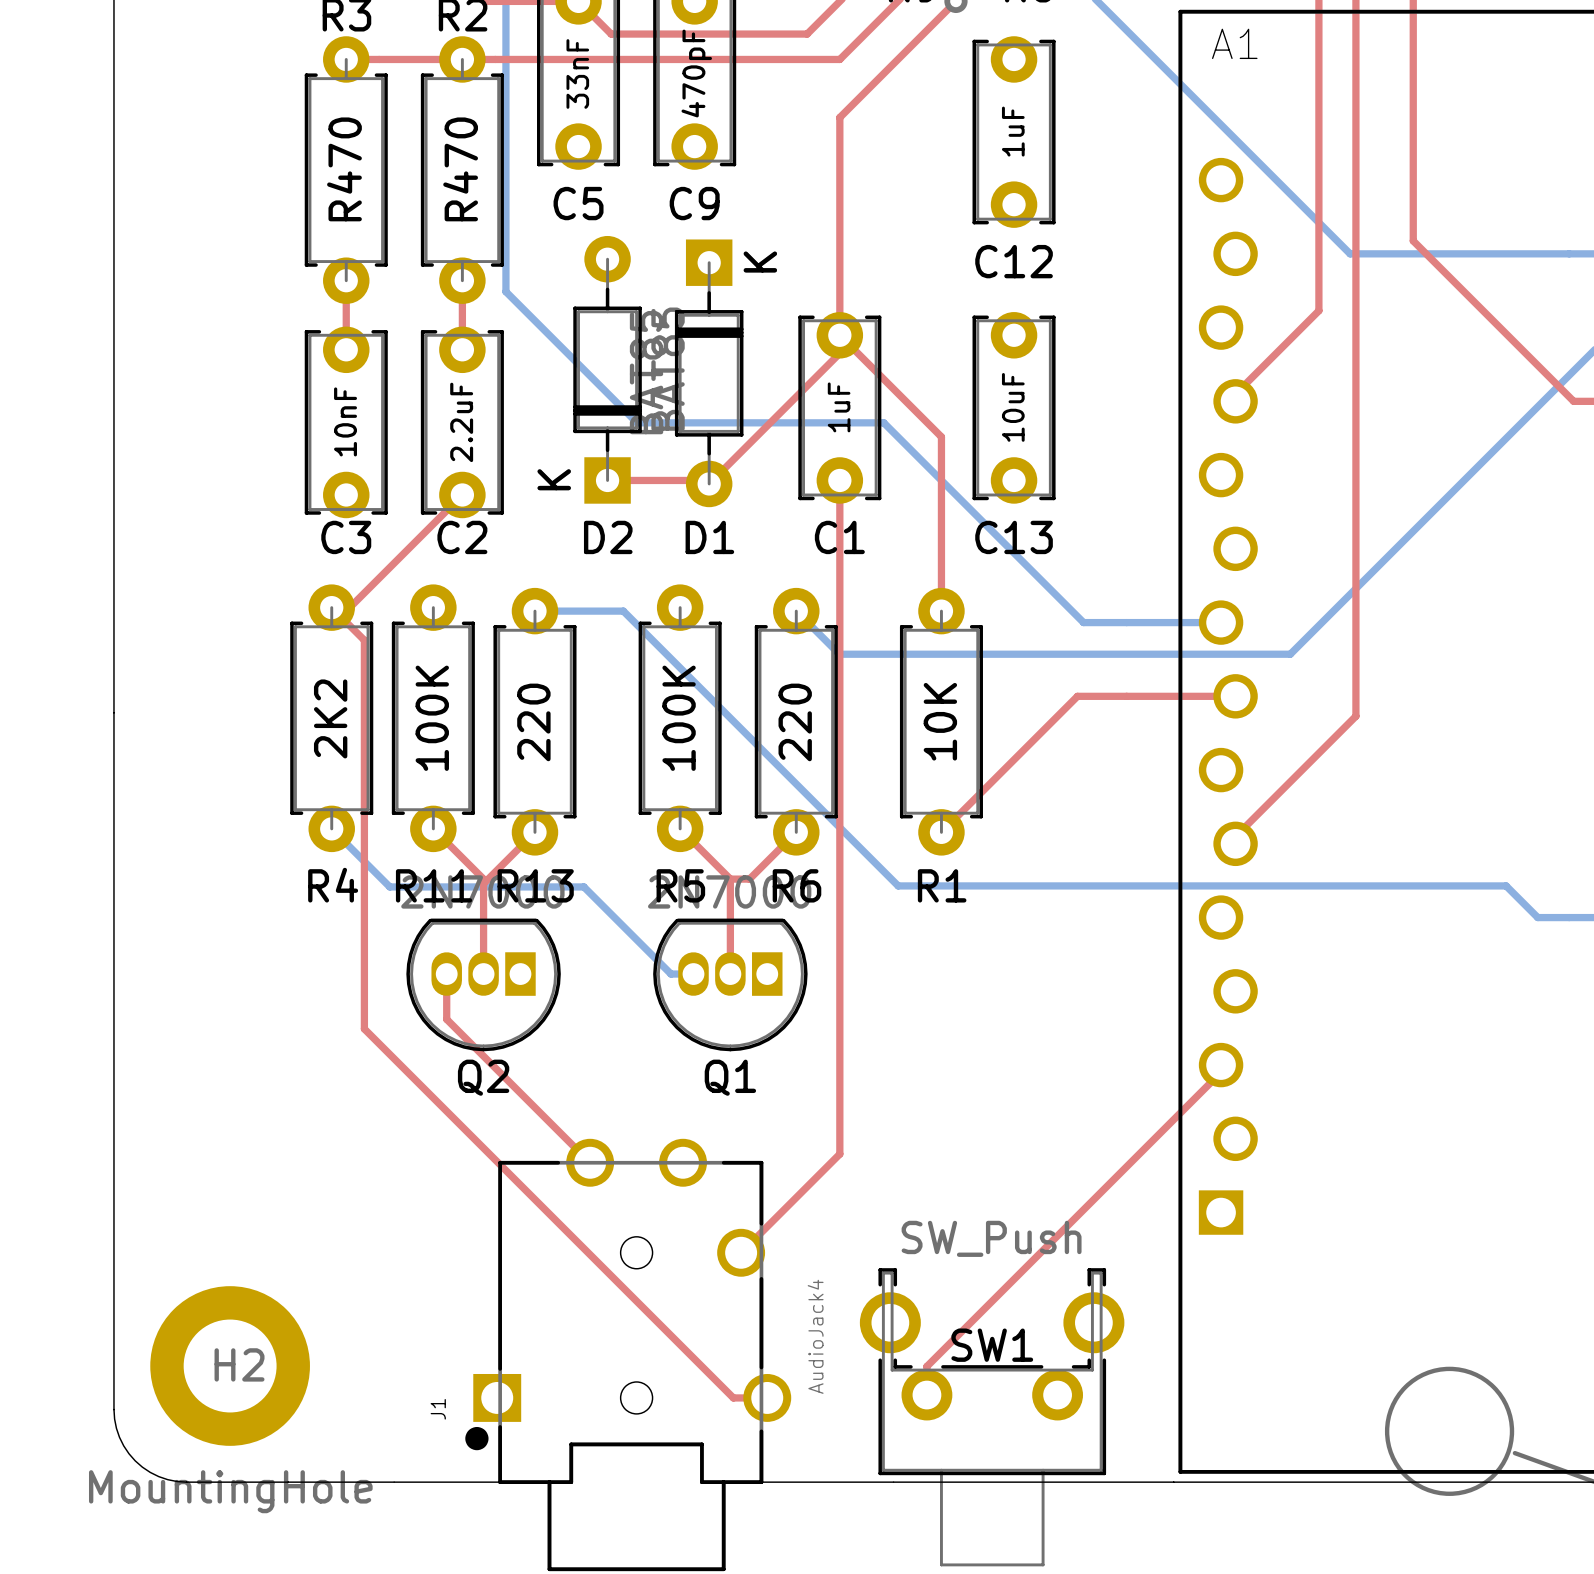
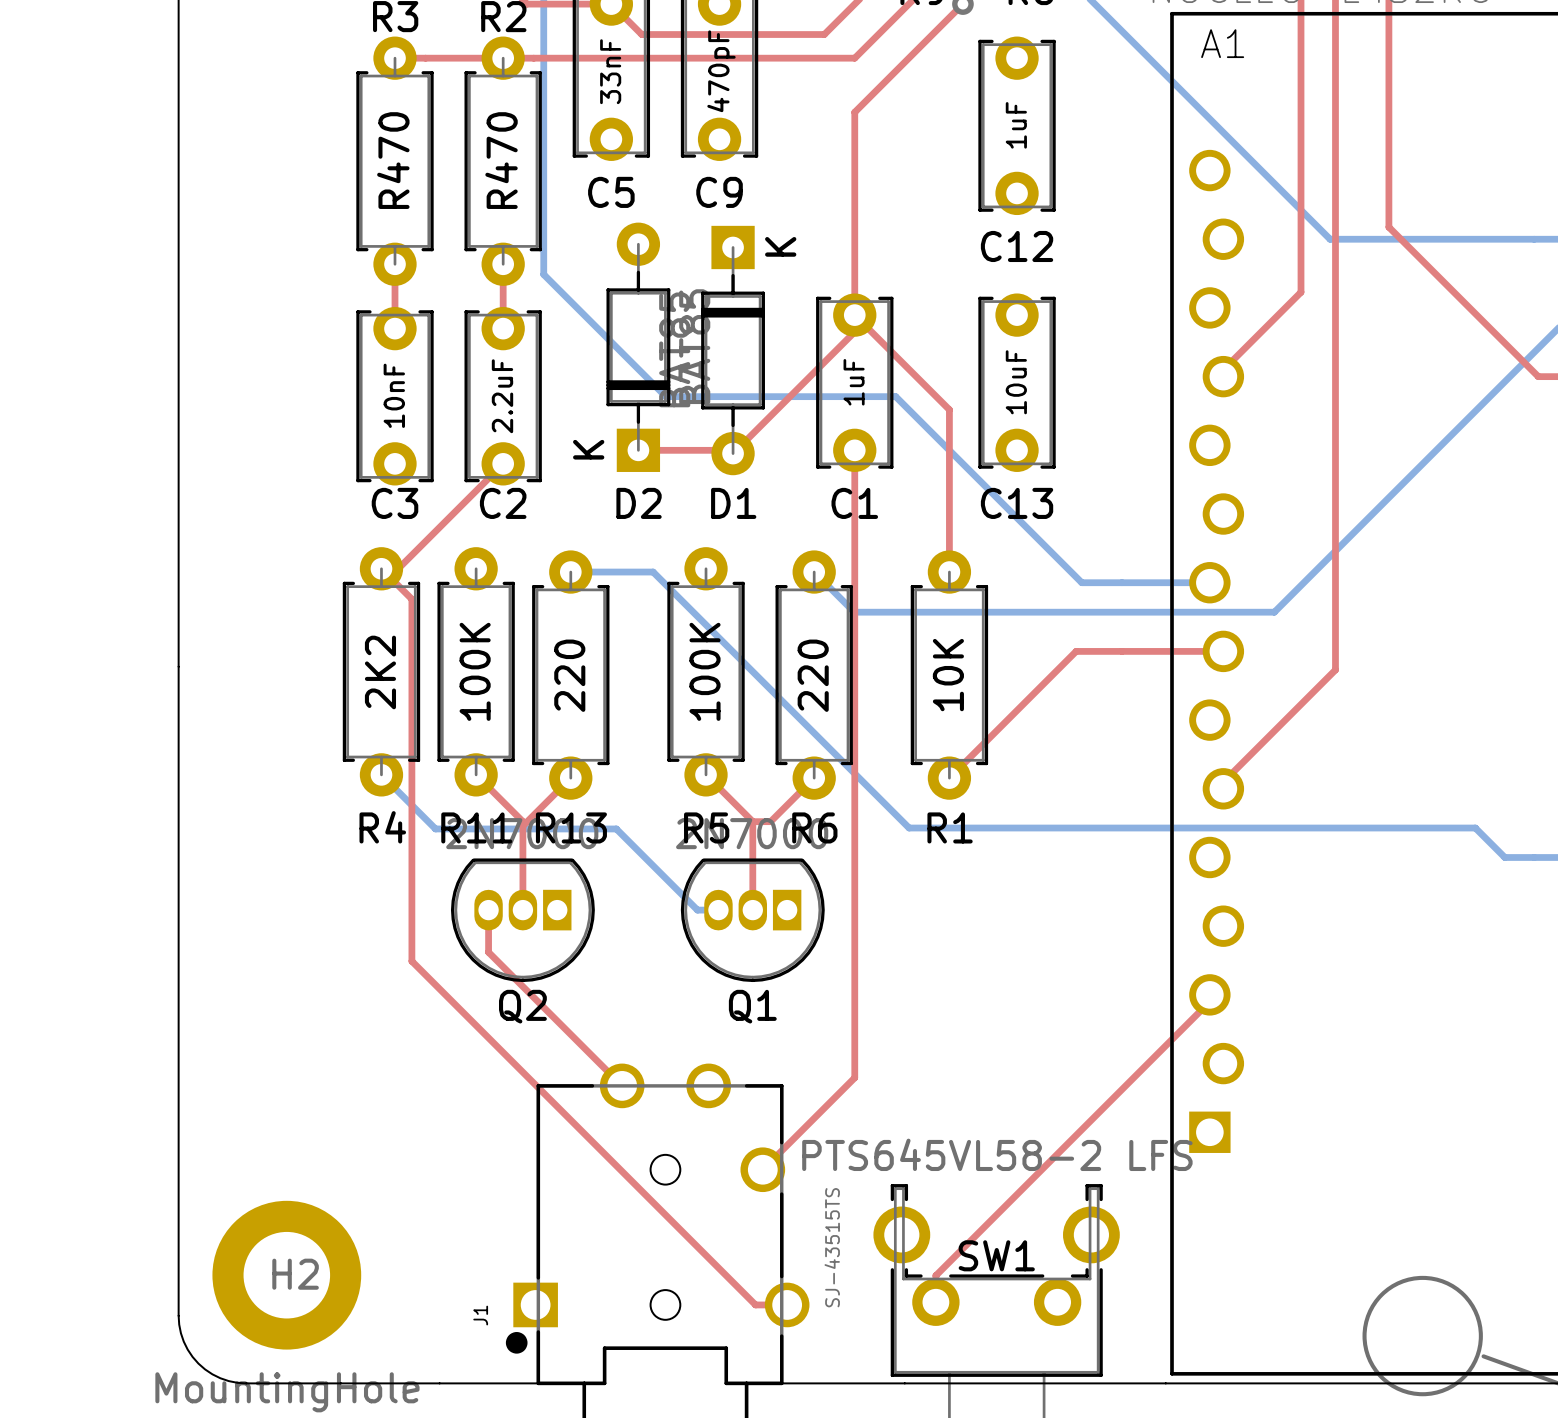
SW1 value: SW_Push (991, 1238) -> PTS645VL58-2 LFS (997, 1154)
J1 value: AudioJack4 (815, 1336) -> SJ-43515TS (832, 1247)

